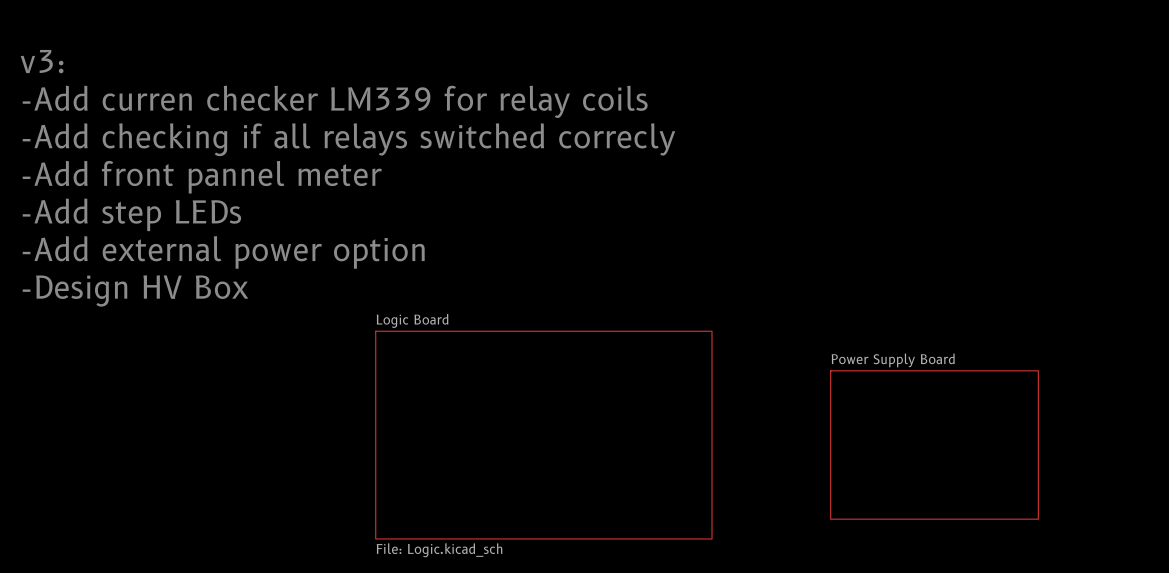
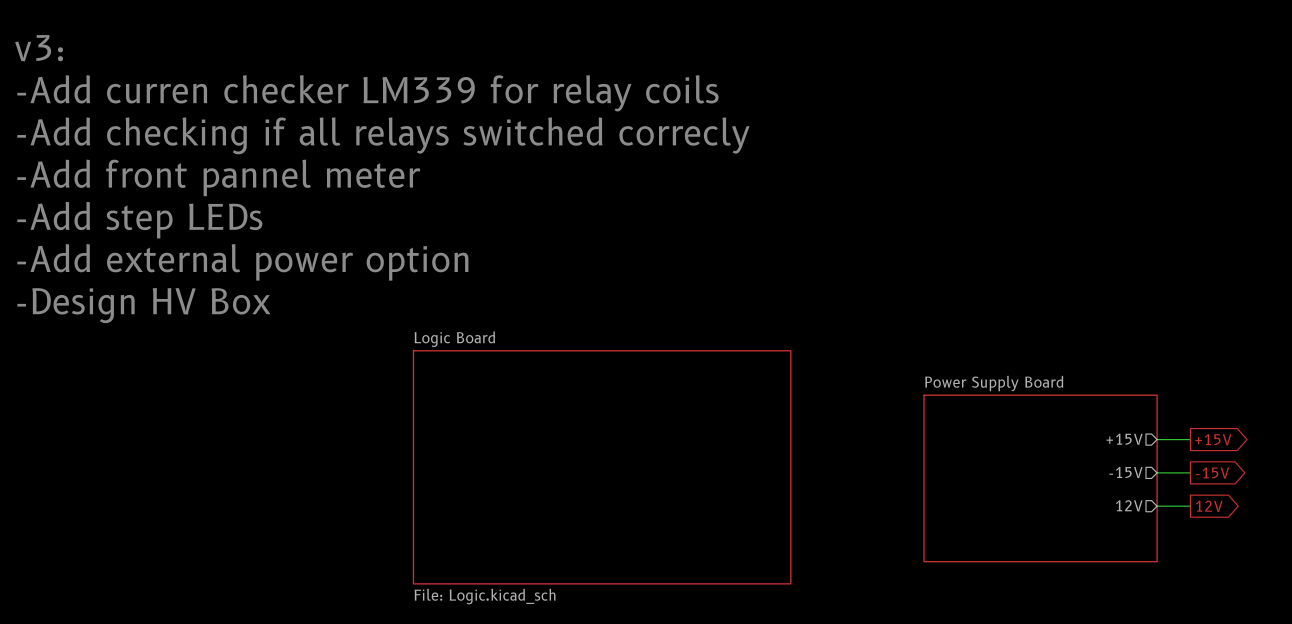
sheet pin: none -> +15V (1124, 439)
wire: none -> (1157, 439) (1190, 439)
global label: none -> +15V (1213, 439)
sheet pin: none -> -15V (1126, 472)
wire: none -> (1157, 472) (1190, 472)
global label: none -> -15V (1212, 472)
sheet pin: none -> 12V (1129, 505)
wire: none -> (1157, 506) (1190, 506)
global label: none -> 12V (1209, 506)

